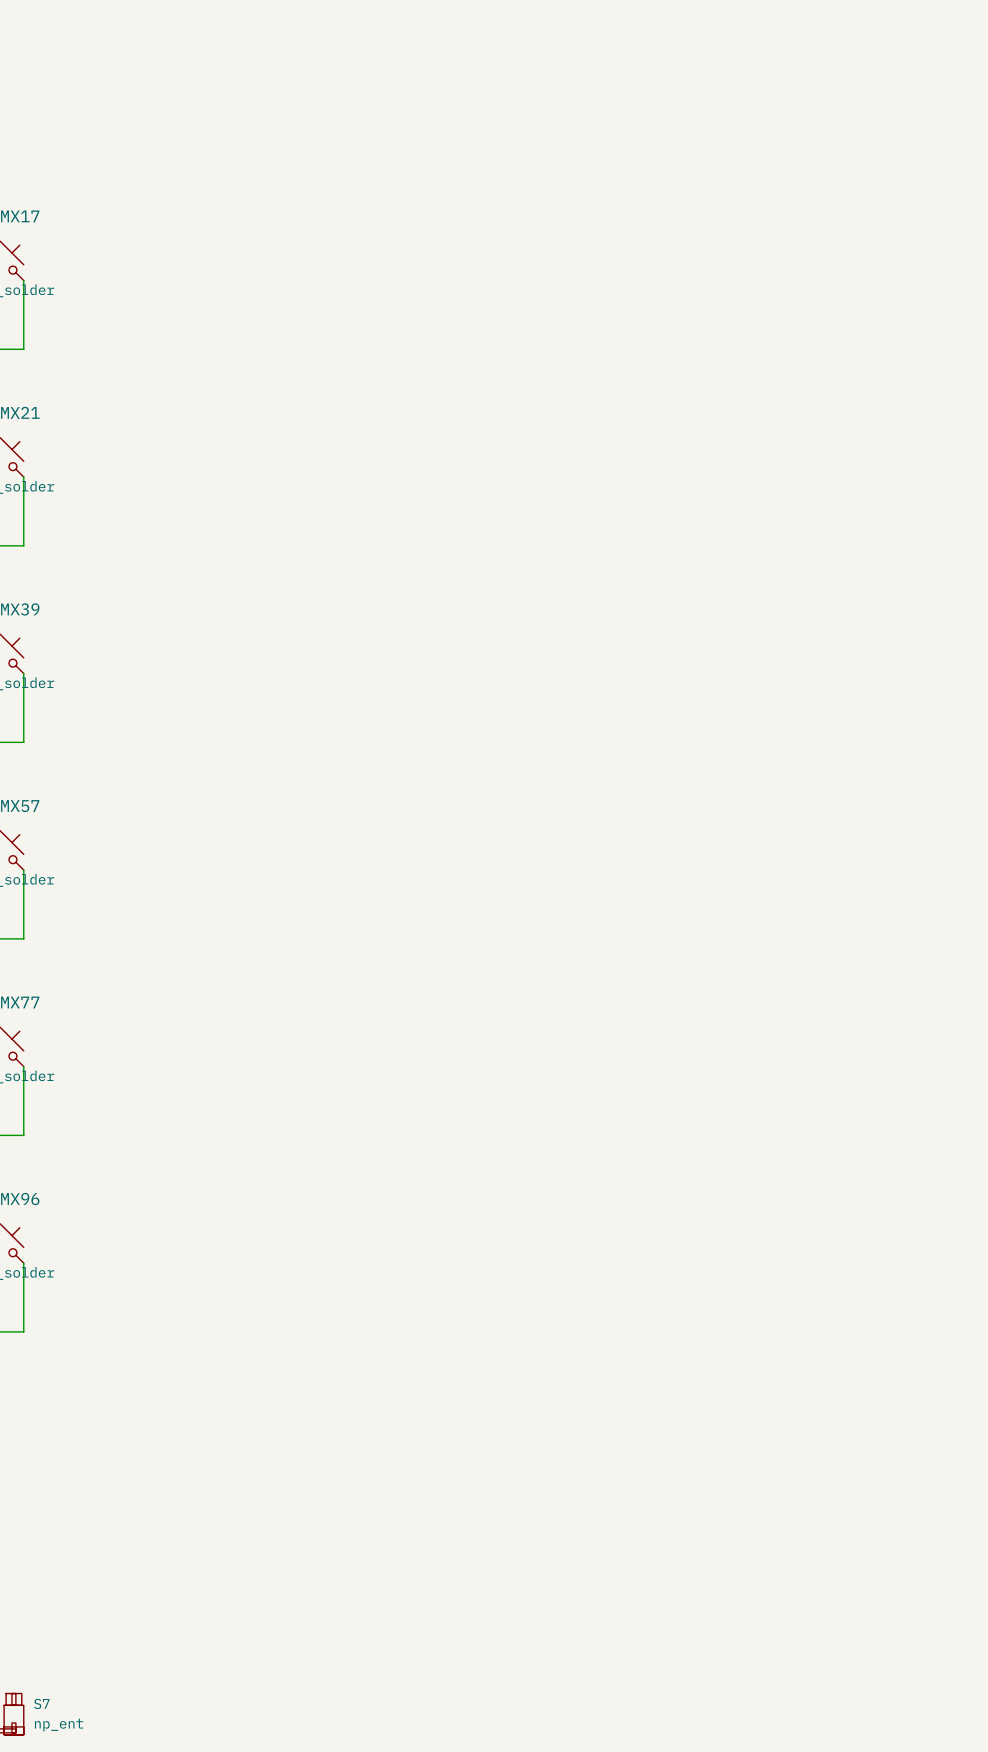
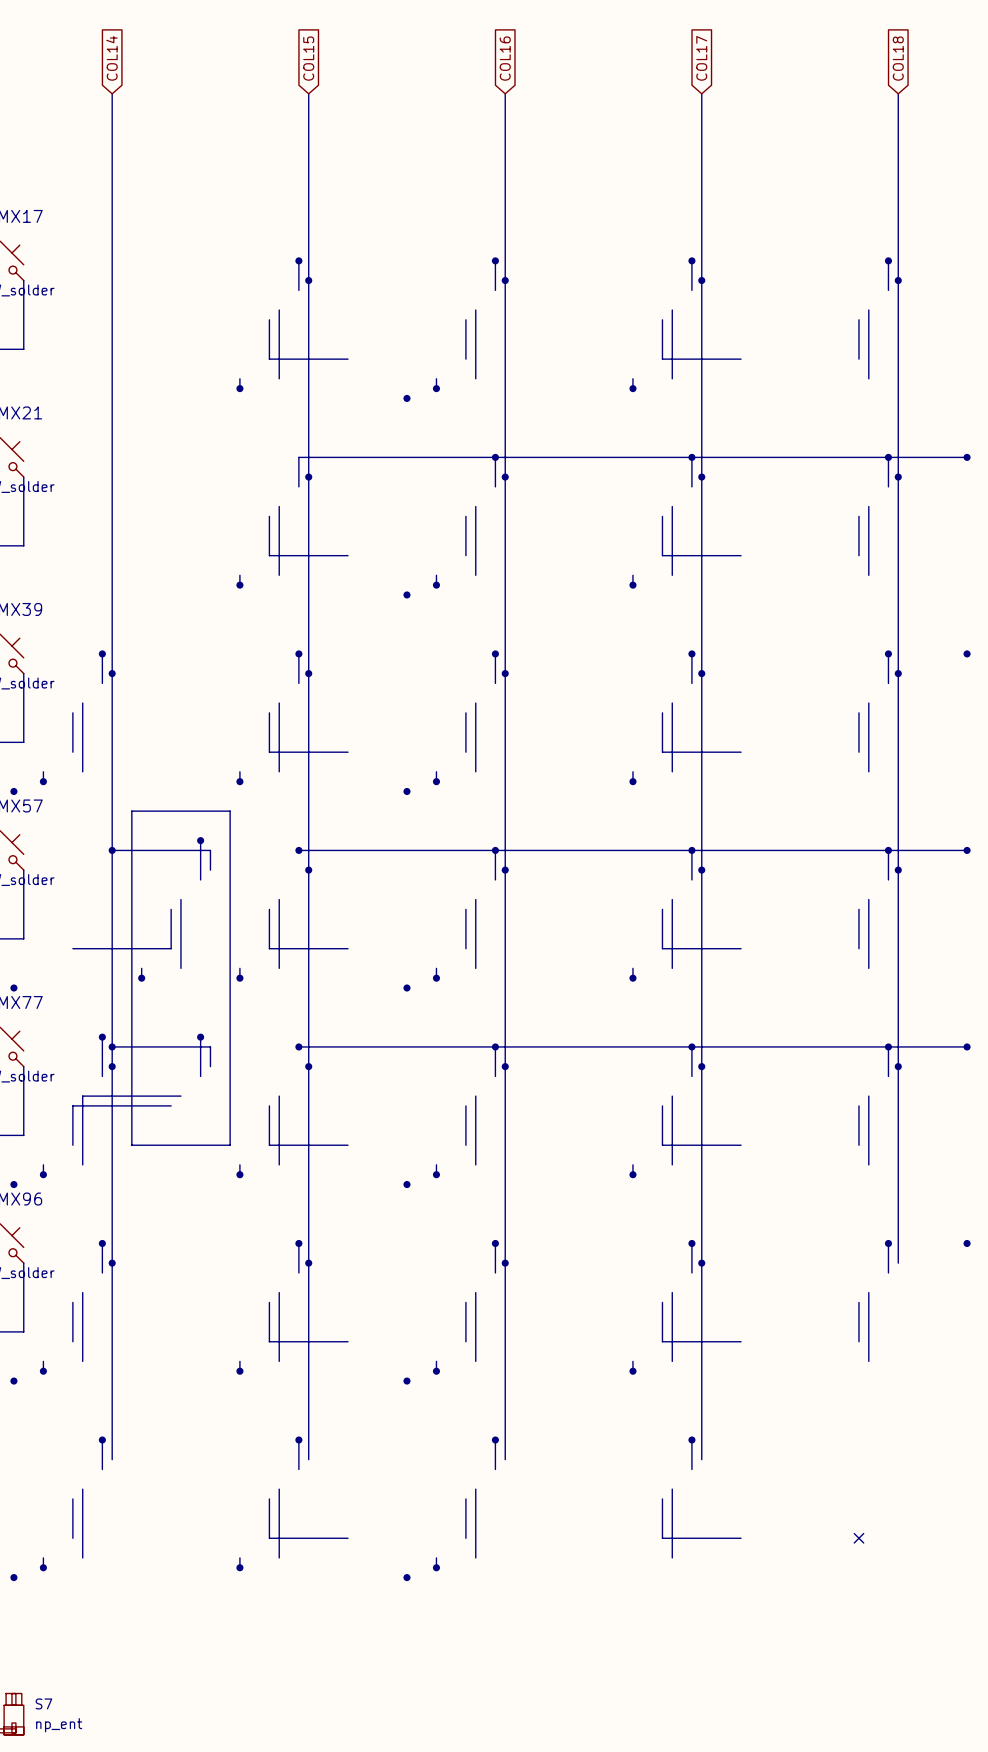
global label: none -> COL14 (111, 58)
global label: none -> COL15 (308, 58)
global label: none -> COL16 (505, 58)
global label: none -> COL17 (701, 58)
global label: none -> COL18 (898, 58)
wire: none -> (112, 93) (112, 1459)
wire: none -> (308, 93) (308, 1459)
wire: none -> (505, 93) (505, 1459)
wire: none -> (701, 93) (701, 1459)
wire: none -> (898, 93) (898, 1263)
wire: none -> (298, 260) (298, 290)
junction: none -> (298, 260)
wire: none -> (495, 260) (495, 290)
junction: none -> (495, 260)
wire: none -> (691, 260) (691, 290)
junction: none -> (691, 260)
wire: none -> (888, 260) (888, 290)
junction: none -> (888, 260)
junction: none -> (308, 280)
junction: none -> (505, 280)
junction: none -> (701, 280)
junction: none -> (898, 280)
wire: none -> (279, 310) (279, 378)
wire: none -> (475, 310) (475, 378)
wire: none -> (672, 310) (672, 378)
wire: none -> (868, 310) (868, 378)
wire: none -> (269, 319) (269, 359) (348, 359)
wire: none -> (465, 319) (465, 359)
wire: none -> (662, 319) (662, 359) (741, 359)
wire: none -> (858, 319) (858, 359)
wire: none -> (239, 378) (239, 388)
wire: none -> (436, 378) (436, 388)
wire: none -> (632, 378) (632, 388)
junction: none -> (239, 388)
junction: none -> (436, 388)
junction: none -> (632, 388)
junction: none -> (406, 398)
wire: none -> (495, 457) (495, 486)
junction: none -> (495, 457)
wire: none -> (691, 457) (691, 486)
junction: none -> (691, 457)
wire: none -> (888, 457) (888, 486)
junction: none -> (888, 457)
wire: none -> (967, 457) (298, 457) (298, 486)
junction: none -> (967, 457)
junction: none -> (308, 477)
junction: none -> (505, 477)
junction: none -> (701, 477)
junction: none -> (898, 477)
wire: none -> (279, 506) (279, 575)
wire: none -> (475, 506) (475, 575)
wire: none -> (672, 506) (672, 575)
wire: none -> (868, 506) (868, 575)
wire: none -> (269, 516) (269, 555) (348, 555)
wire: none -> (465, 516) (465, 555)
wire: none -> (662, 516) (662, 555) (741, 555)
wire: none -> (858, 516) (858, 555)
wire: none -> (239, 575) (239, 585)
wire: none -> (436, 575) (436, 585)
wire: none -> (632, 575) (632, 585)
junction: none -> (239, 585)
junction: none -> (436, 585)
junction: none -> (632, 585)
junction: none -> (406, 594)
wire: none -> (102, 653) (102, 683)
junction: none -> (102, 653)
wire: none -> (298, 653) (298, 683)
junction: none -> (298, 653)
wire: none -> (495, 653) (495, 683)
junction: none -> (495, 653)
wire: none -> (691, 653) (691, 683)
junction: none -> (691, 653)
wire: none -> (888, 653) (888, 683)
junction: none -> (888, 653)
junction: none -> (967, 653)
junction: none -> (112, 673)
junction: none -> (308, 673)
junction: none -> (505, 673)
junction: none -> (701, 673)
junction: none -> (898, 673)
wire: none -> (82, 703) (82, 771)
wire: none -> (279, 703) (279, 771)
wire: none -> (475, 703) (475, 771)
wire: none -> (672, 703) (672, 771)
wire: none -> (868, 703) (868, 771)
wire: none -> (72, 712) (72, 752)
wire: none -> (269, 712) (269, 752) (348, 752)
wire: none -> (465, 712) (465, 752)
wire: none -> (662, 712) (662, 752) (741, 752)
wire: none -> (858, 712) (858, 752)
wire: none -> (43, 771) (43, 781)
wire: none -> (239, 771) (239, 781)
wire: none -> (436, 771) (436, 781)
wire: none -> (632, 771) (632, 781)
junction: none -> (43, 781)
junction: none -> (239, 781)
junction: none -> (436, 781)
junction: none -> (632, 781)
junction: none -> (13, 791)
junction: none -> (406, 791)
line: none -> (131, 811) (131, 1145) (230, 1145) (230, 811) (131, 811)
wire: none -> (200, 840) (200, 879)
junction: none -> (200, 840)
wire: none -> (112, 850) (210, 850) (210, 870)
junction: none -> (112, 850)
wire: none -> (298, 850) (967, 850)
junction: none -> (298, 850)
wire: none -> (495, 850) (495, 879)
junction: none -> (495, 850)
wire: none -> (691, 850) (691, 879)
junction: none -> (691, 850)
wire: none -> (888, 850) (888, 879)
junction: none -> (888, 850)
junction: none -> (967, 850)
junction: none -> (308, 870)
junction: none -> (505, 870)
junction: none -> (701, 870)
junction: none -> (898, 870)
wire: none -> (180, 899) (180, 968)
wire: none -> (279, 899) (279, 968)
wire: none -> (475, 899) (475, 968)
wire: none -> (672, 899) (672, 968)
wire: none -> (868, 899) (868, 968)
wire: none -> (171, 909) (171, 948) (72, 948)
wire: none -> (269, 909) (269, 948) (348, 948)
wire: none -> (465, 909) (465, 948)
wire: none -> (662, 909) (662, 948) (741, 948)
wire: none -> (858, 909) (858, 948)
wire: none -> (141, 968) (141, 978)
wire: none -> (239, 968) (239, 978)
wire: none -> (436, 968) (436, 978)
wire: none -> (632, 968) (632, 978)
junction: none -> (141, 978)
junction: none -> (239, 978)
junction: none -> (436, 978)
junction: none -> (632, 978)
junction: none -> (13, 988)
junction: none -> (406, 988)
wire: none -> (102, 1037) (102, 1076)
junction: none -> (102, 1037)
wire: none -> (200, 1037) (200, 1076)
junction: none -> (200, 1037)
wire: none -> (112, 1046) (210, 1046) (210, 1066)
junction: none -> (112, 1046)
wire: none -> (298, 1046) (967, 1046)
junction: none -> (298, 1046)
wire: none -> (495, 1046) (495, 1076)
junction: none -> (495, 1046)
wire: none -> (691, 1046) (691, 1076)
junction: none -> (691, 1046)
wire: none -> (888, 1046) (888, 1076)
junction: none -> (888, 1046)
junction: none -> (967, 1046)
junction: none -> (112, 1066)
junction: none -> (308, 1066)
junction: none -> (505, 1066)
junction: none -> (701, 1066)
junction: none -> (898, 1066)
wire: none -> (180, 1096) (82, 1096) (82, 1164)
wire: none -> (279, 1096) (279, 1164)
wire: none -> (475, 1096) (475, 1164)
wire: none -> (672, 1096) (672, 1164)
wire: none -> (868, 1096) (868, 1164)
wire: none -> (171, 1105) (72, 1105) (72, 1145)
wire: none -> (269, 1105) (269, 1145) (348, 1145)
wire: none -> (465, 1105) (465, 1145)
wire: none -> (662, 1105) (662, 1145) (741, 1145)
wire: none -> (858, 1105) (858, 1145)
wire: none -> (43, 1164) (43, 1174)
wire: none -> (239, 1164) (239, 1174)
wire: none -> (436, 1164) (436, 1174)
wire: none -> (632, 1164) (632, 1174)
junction: none -> (43, 1174)
junction: none -> (239, 1174)
junction: none -> (436, 1174)
junction: none -> (632, 1174)
junction: none -> (13, 1184)
junction: none -> (406, 1184)
wire: none -> (102, 1243) (102, 1272)
junction: none -> (102, 1243)
wire: none -> (298, 1243) (298, 1272)
junction: none -> (298, 1243)
wire: none -> (495, 1243) (495, 1272)
junction: none -> (495, 1243)
wire: none -> (691, 1243) (691, 1272)
junction: none -> (691, 1243)
wire: none -> (888, 1243) (888, 1272)
junction: none -> (888, 1243)
junction: none -> (967, 1243)
junction: none -> (112, 1263)
junction: none -> (308, 1263)
junction: none -> (505, 1263)
junction: none -> (701, 1263)
wire: none -> (82, 1292) (82, 1361)
wire: none -> (279, 1292) (279, 1361)
wire: none -> (475, 1292) (475, 1361)
wire: none -> (672, 1292) (672, 1361)
wire: none -> (868, 1292) (868, 1361)
wire: none -> (72, 1302) (72, 1341)
wire: none -> (269, 1302) (269, 1341) (348, 1341)
wire: none -> (465, 1302) (465, 1341)
wire: none -> (662, 1302) (662, 1341) (741, 1341)
wire: none -> (858, 1302) (858, 1341)
wire: none -> (43, 1361) (43, 1371)
wire: none -> (239, 1361) (239, 1371)
wire: none -> (436, 1361) (436, 1371)
wire: none -> (632, 1361) (632, 1371)
junction: none -> (43, 1371)
junction: none -> (239, 1371)
junction: none -> (436, 1371)
junction: none -> (632, 1371)
junction: none -> (13, 1381)
junction: none -> (406, 1381)
wire: none -> (102, 1440) (102, 1469)
junction: none -> (102, 1440)
wire: none -> (298, 1440) (298, 1469)
junction: none -> (298, 1440)
wire: none -> (495, 1440) (495, 1469)
junction: none -> (495, 1440)
wire: none -> (691, 1440) (691, 1469)
junction: none -> (691, 1440)
wire: none -> (82, 1489) (82, 1557)
wire: none -> (279, 1489) (279, 1557)
wire: none -> (475, 1489) (475, 1557)
wire: none -> (672, 1489) (672, 1557)
wire: none -> (72, 1498) (72, 1538)
wire: none -> (269, 1498) (269, 1538) (348, 1538)
wire: none -> (465, 1498) (465, 1538)
wire: none -> (662, 1498) (662, 1538) (741, 1538)
no-connect mark: none -> (858, 1538)
wire: none -> (43, 1557) (43, 1567)
wire: none -> (239, 1557) (239, 1567)
wire: none -> (436, 1557) (436, 1567)
junction: none -> (43, 1567)
junction: none -> (239, 1567)
junction: none -> (436, 1567)
junction: none -> (13, 1577)
junction: none -> (406, 1577)

